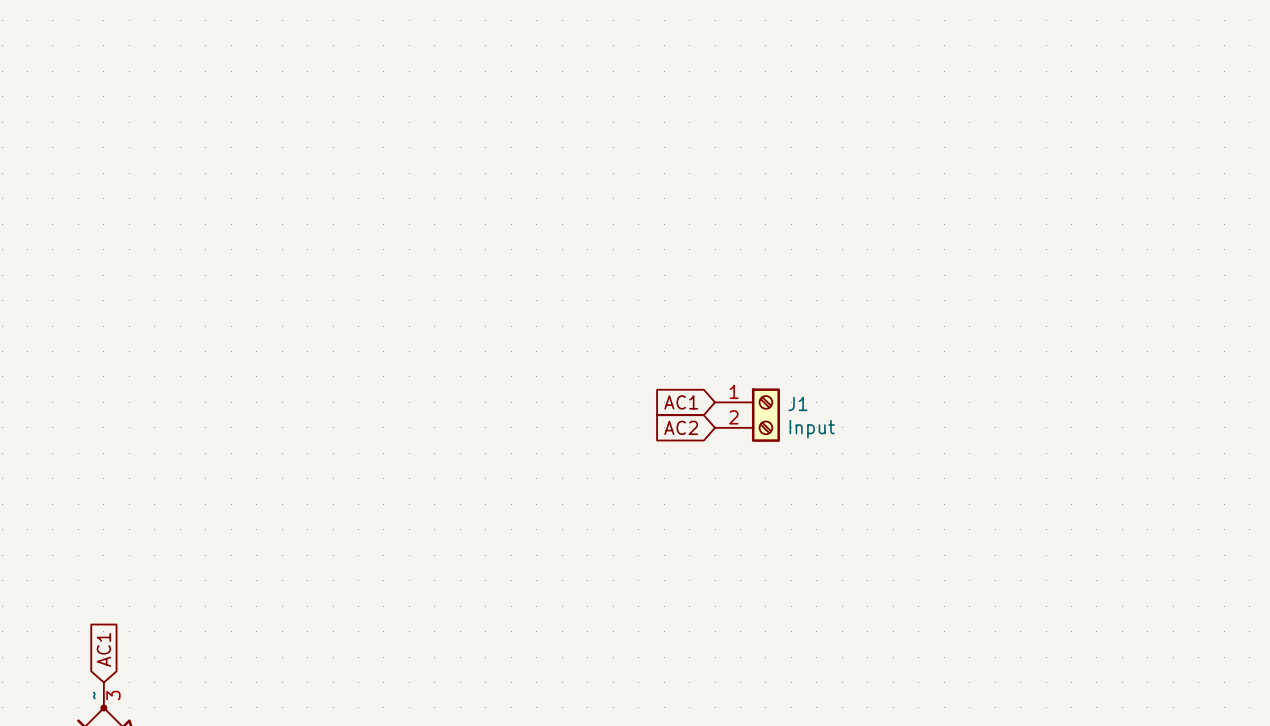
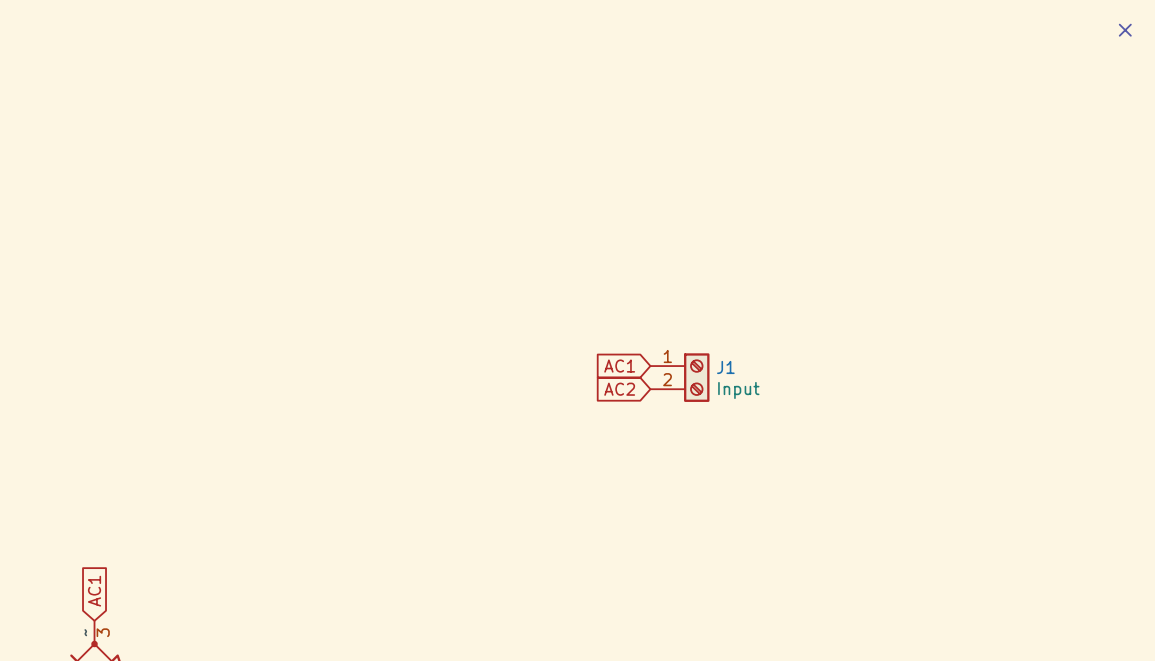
no-connect mark: none -> (1125, 30)

